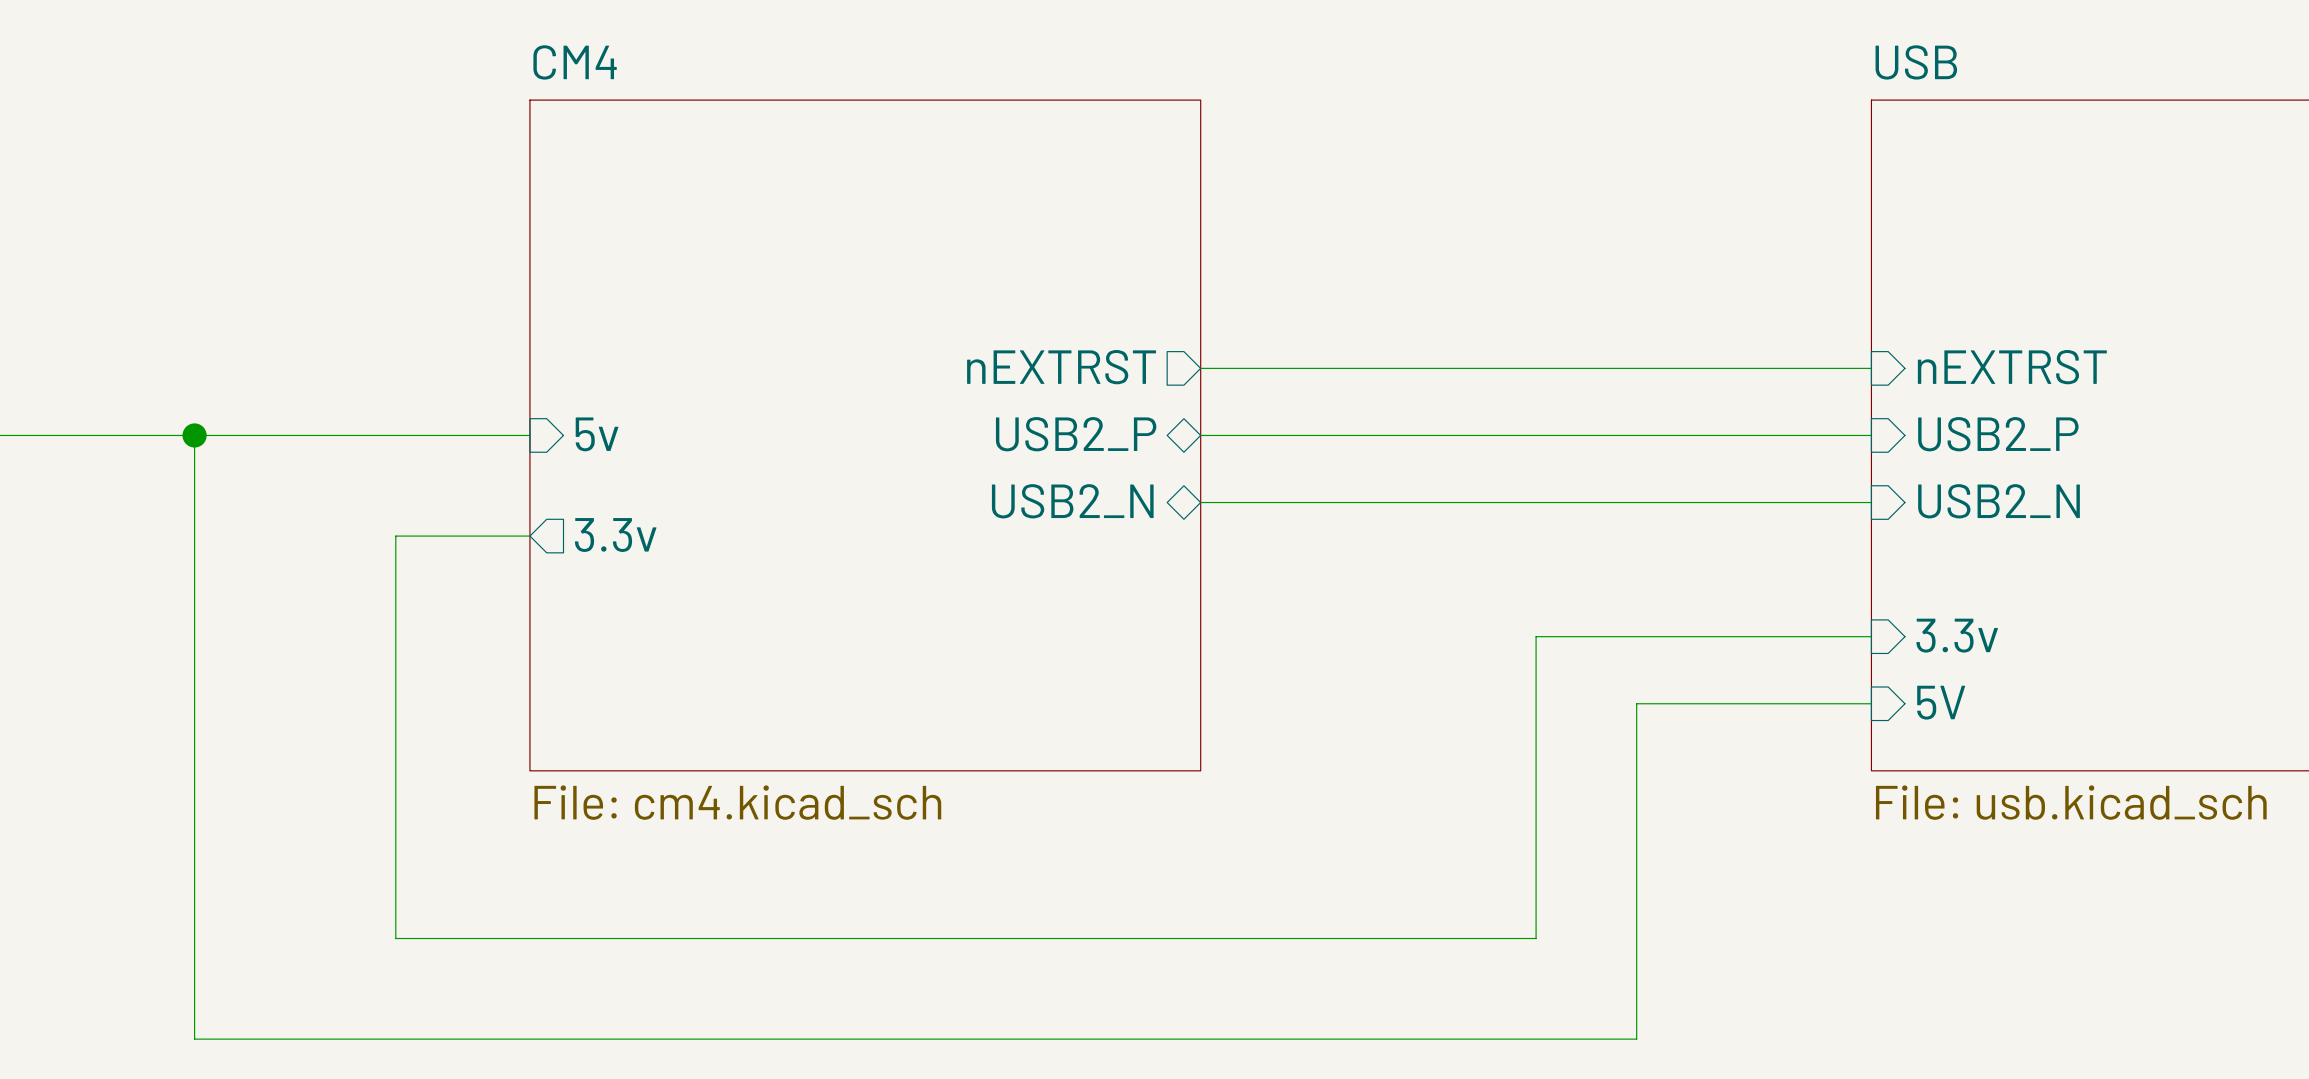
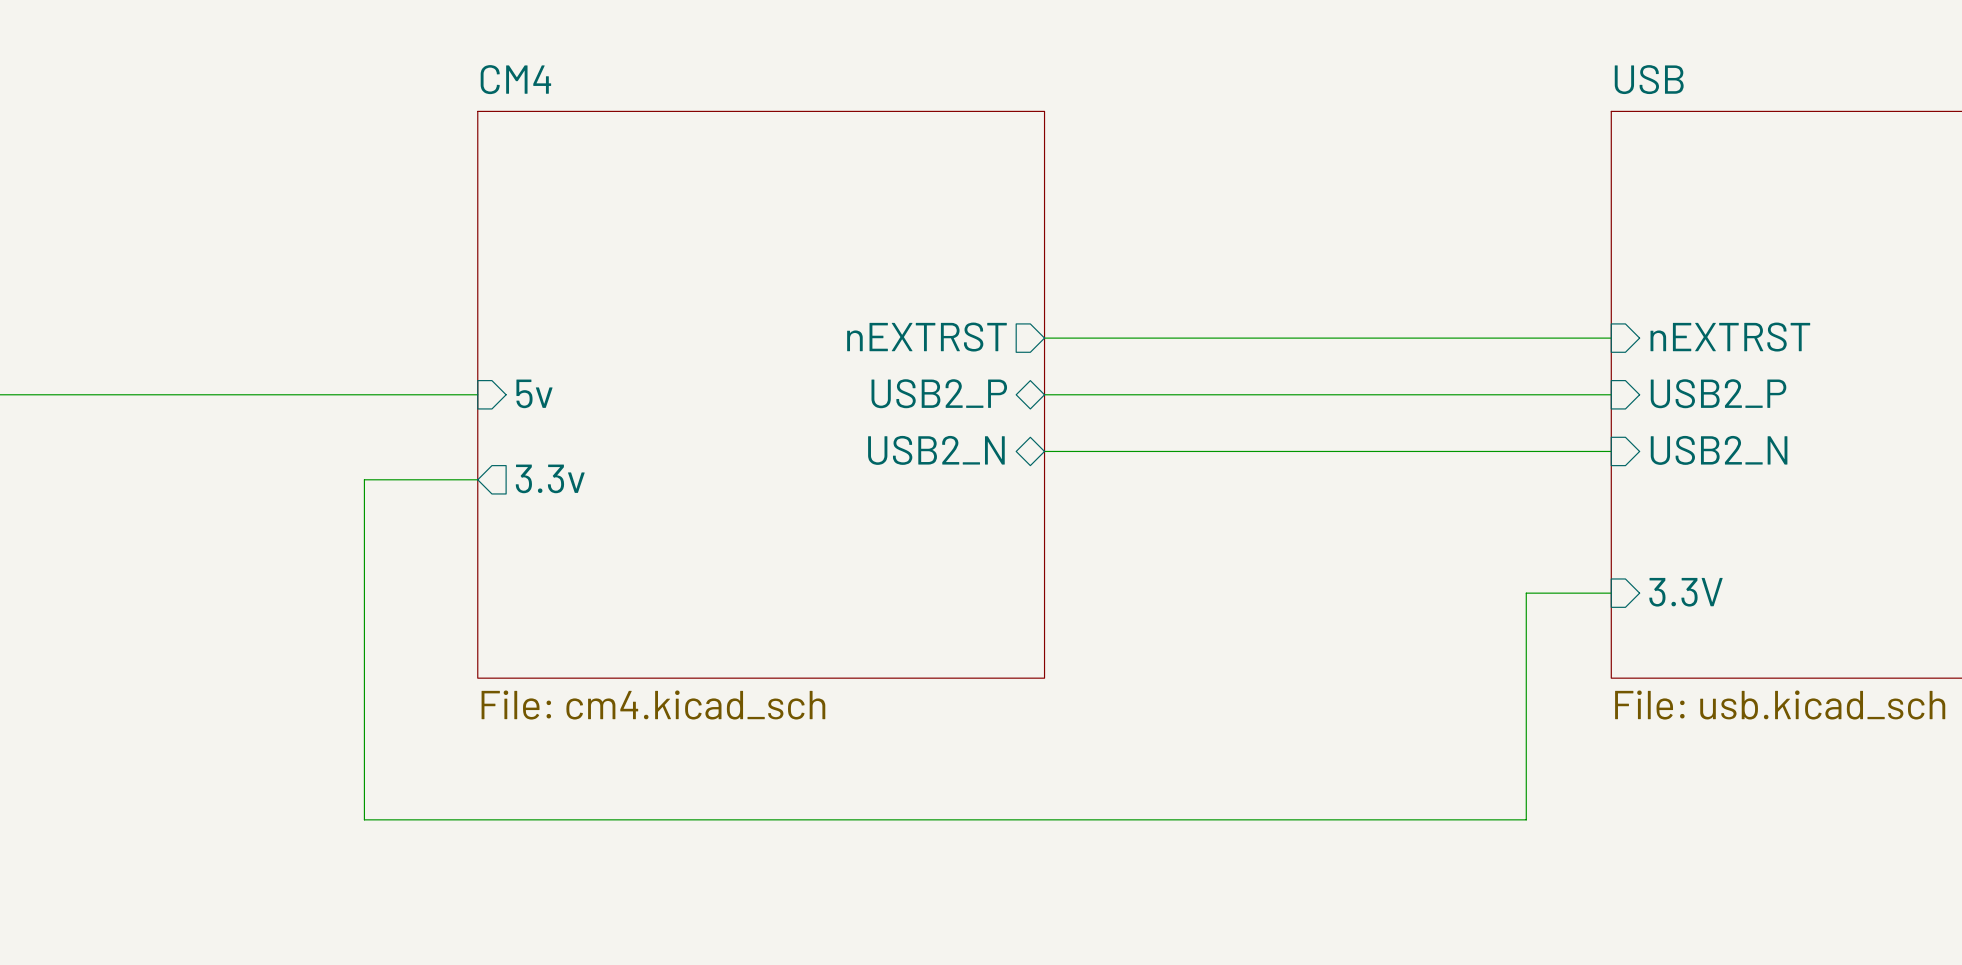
wire: (194, 435) (194, 1039) (1636, 1039) (1636, 703) (1871, 703) -> none
junction: (194, 435) -> none
sheet pin: 3.3v (1957, 635) -> 3.3V (1686, 592)
wire: (1871, 636) (1536, 636) (1536, 938) -> (1611, 593) (1526, 593) (1526, 819) (1327, 819)
sheet pin: 5V (1941, 702) -> none

